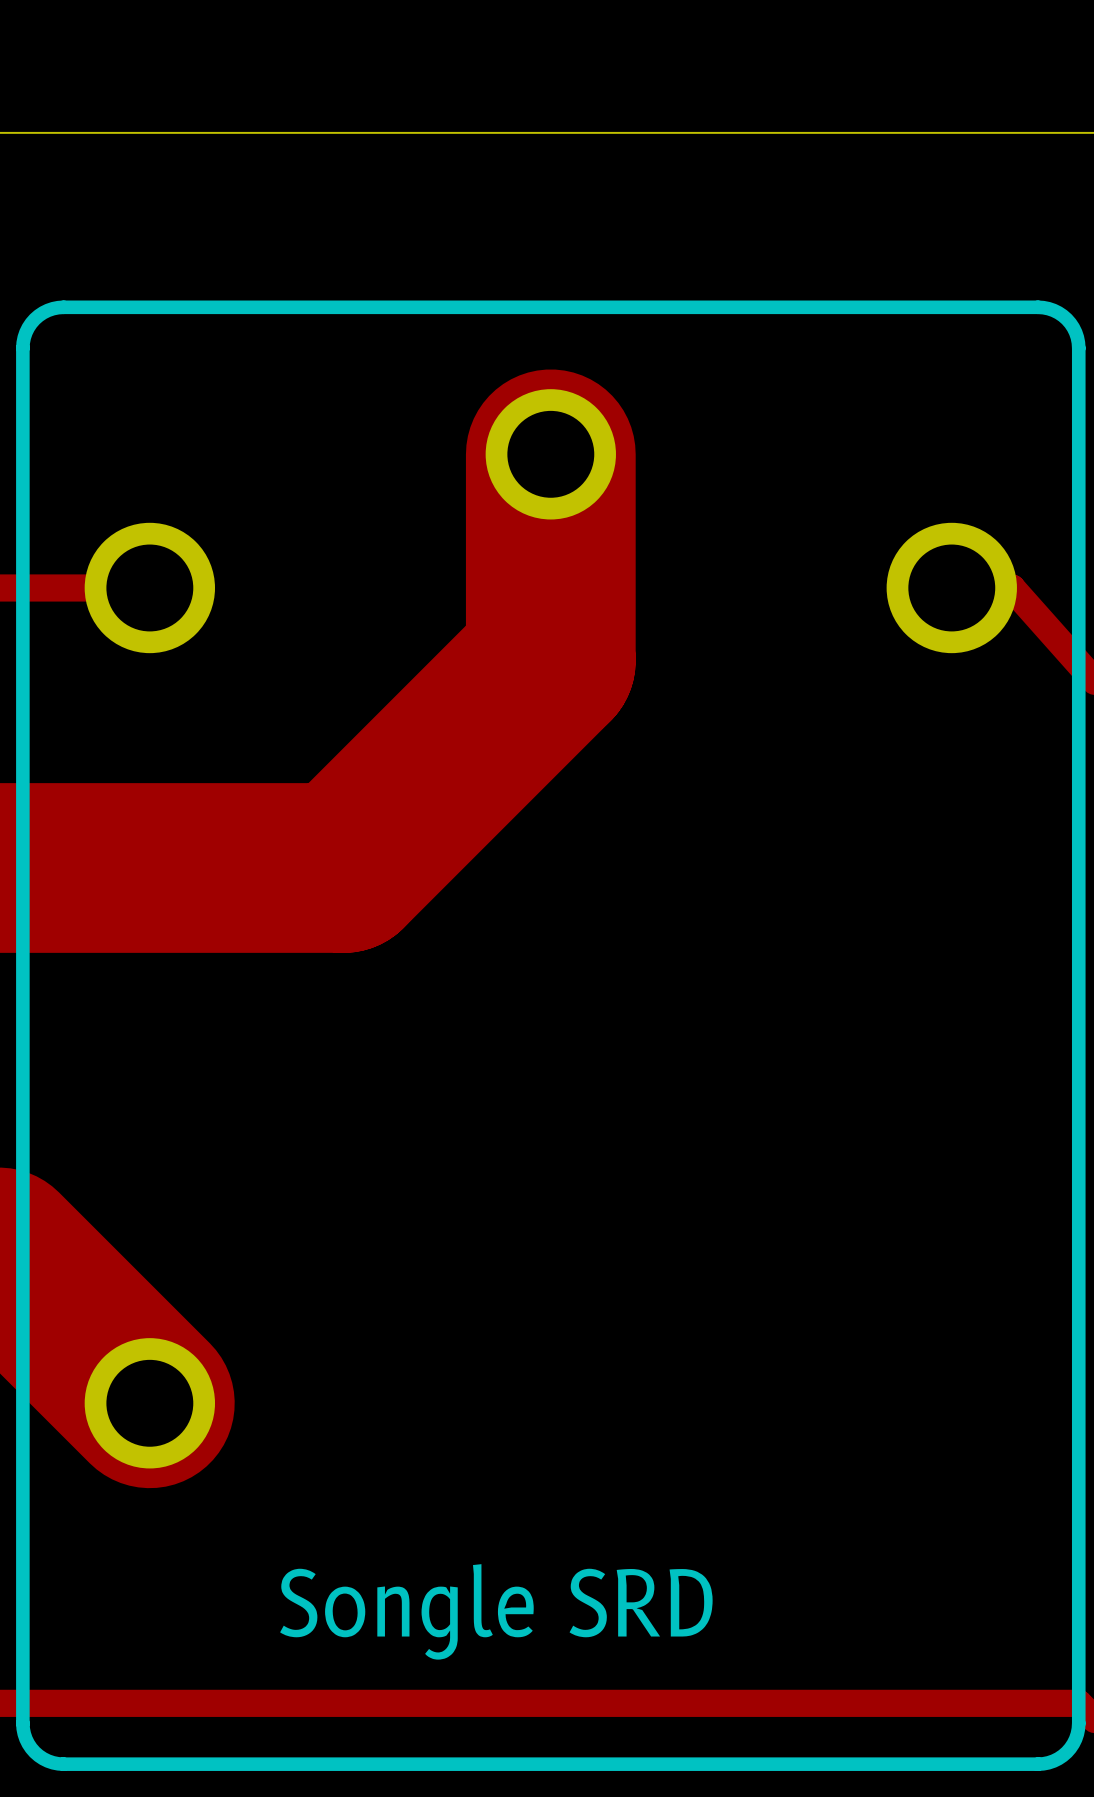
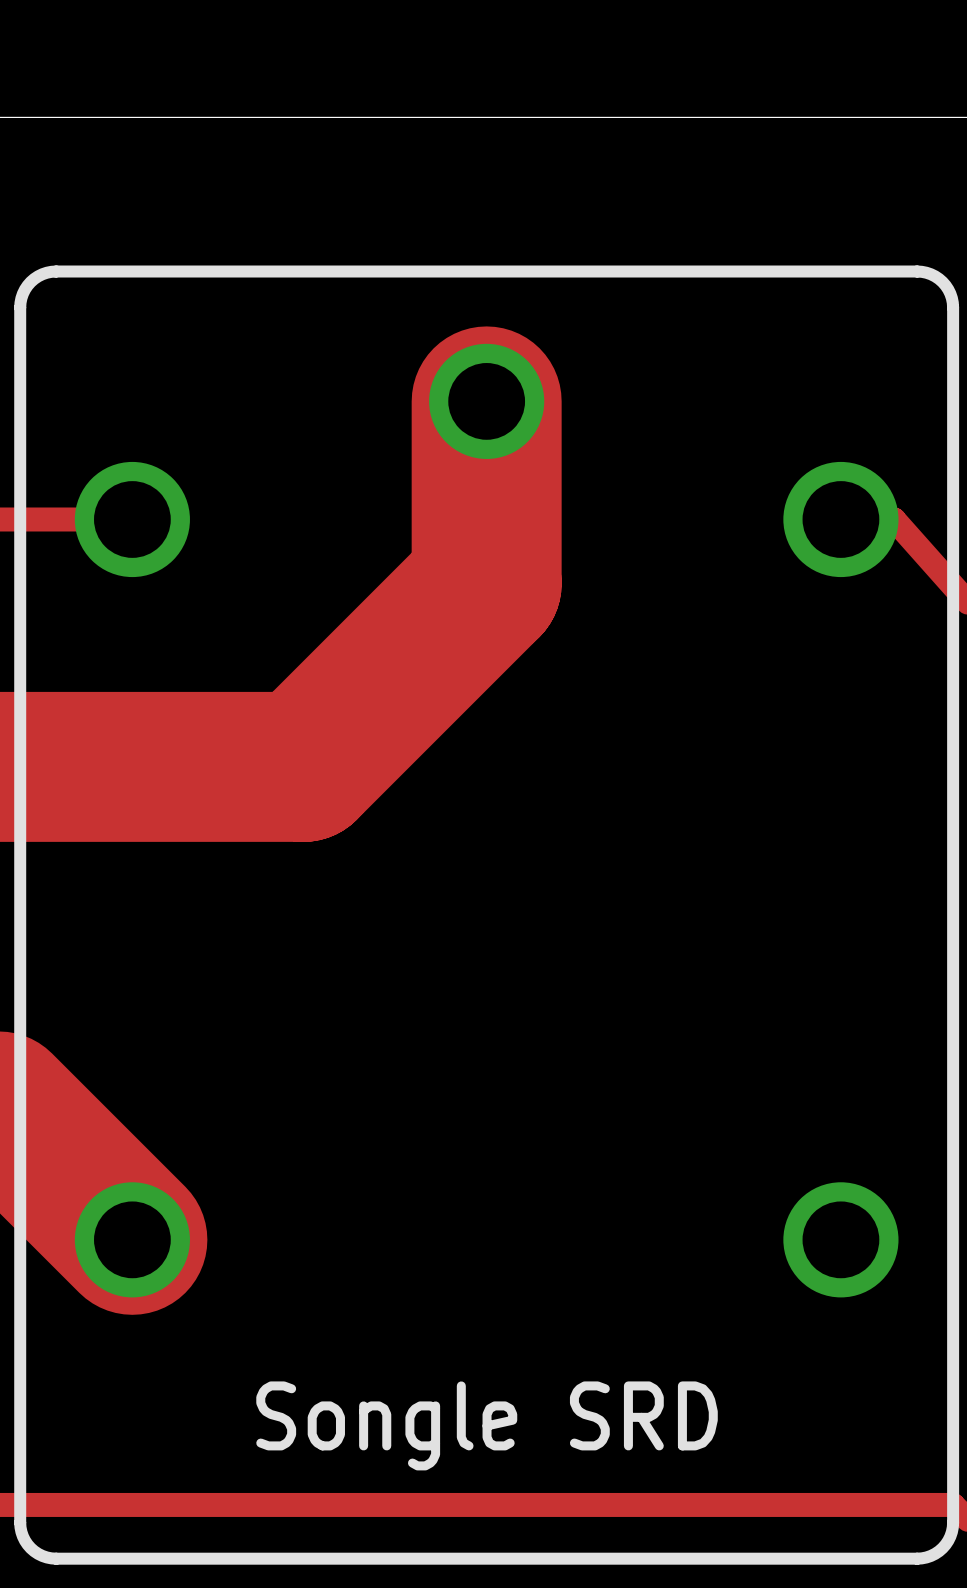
part footprint: [16, 300, 1086, 1771] -> [14, 265, 960, 1565]

